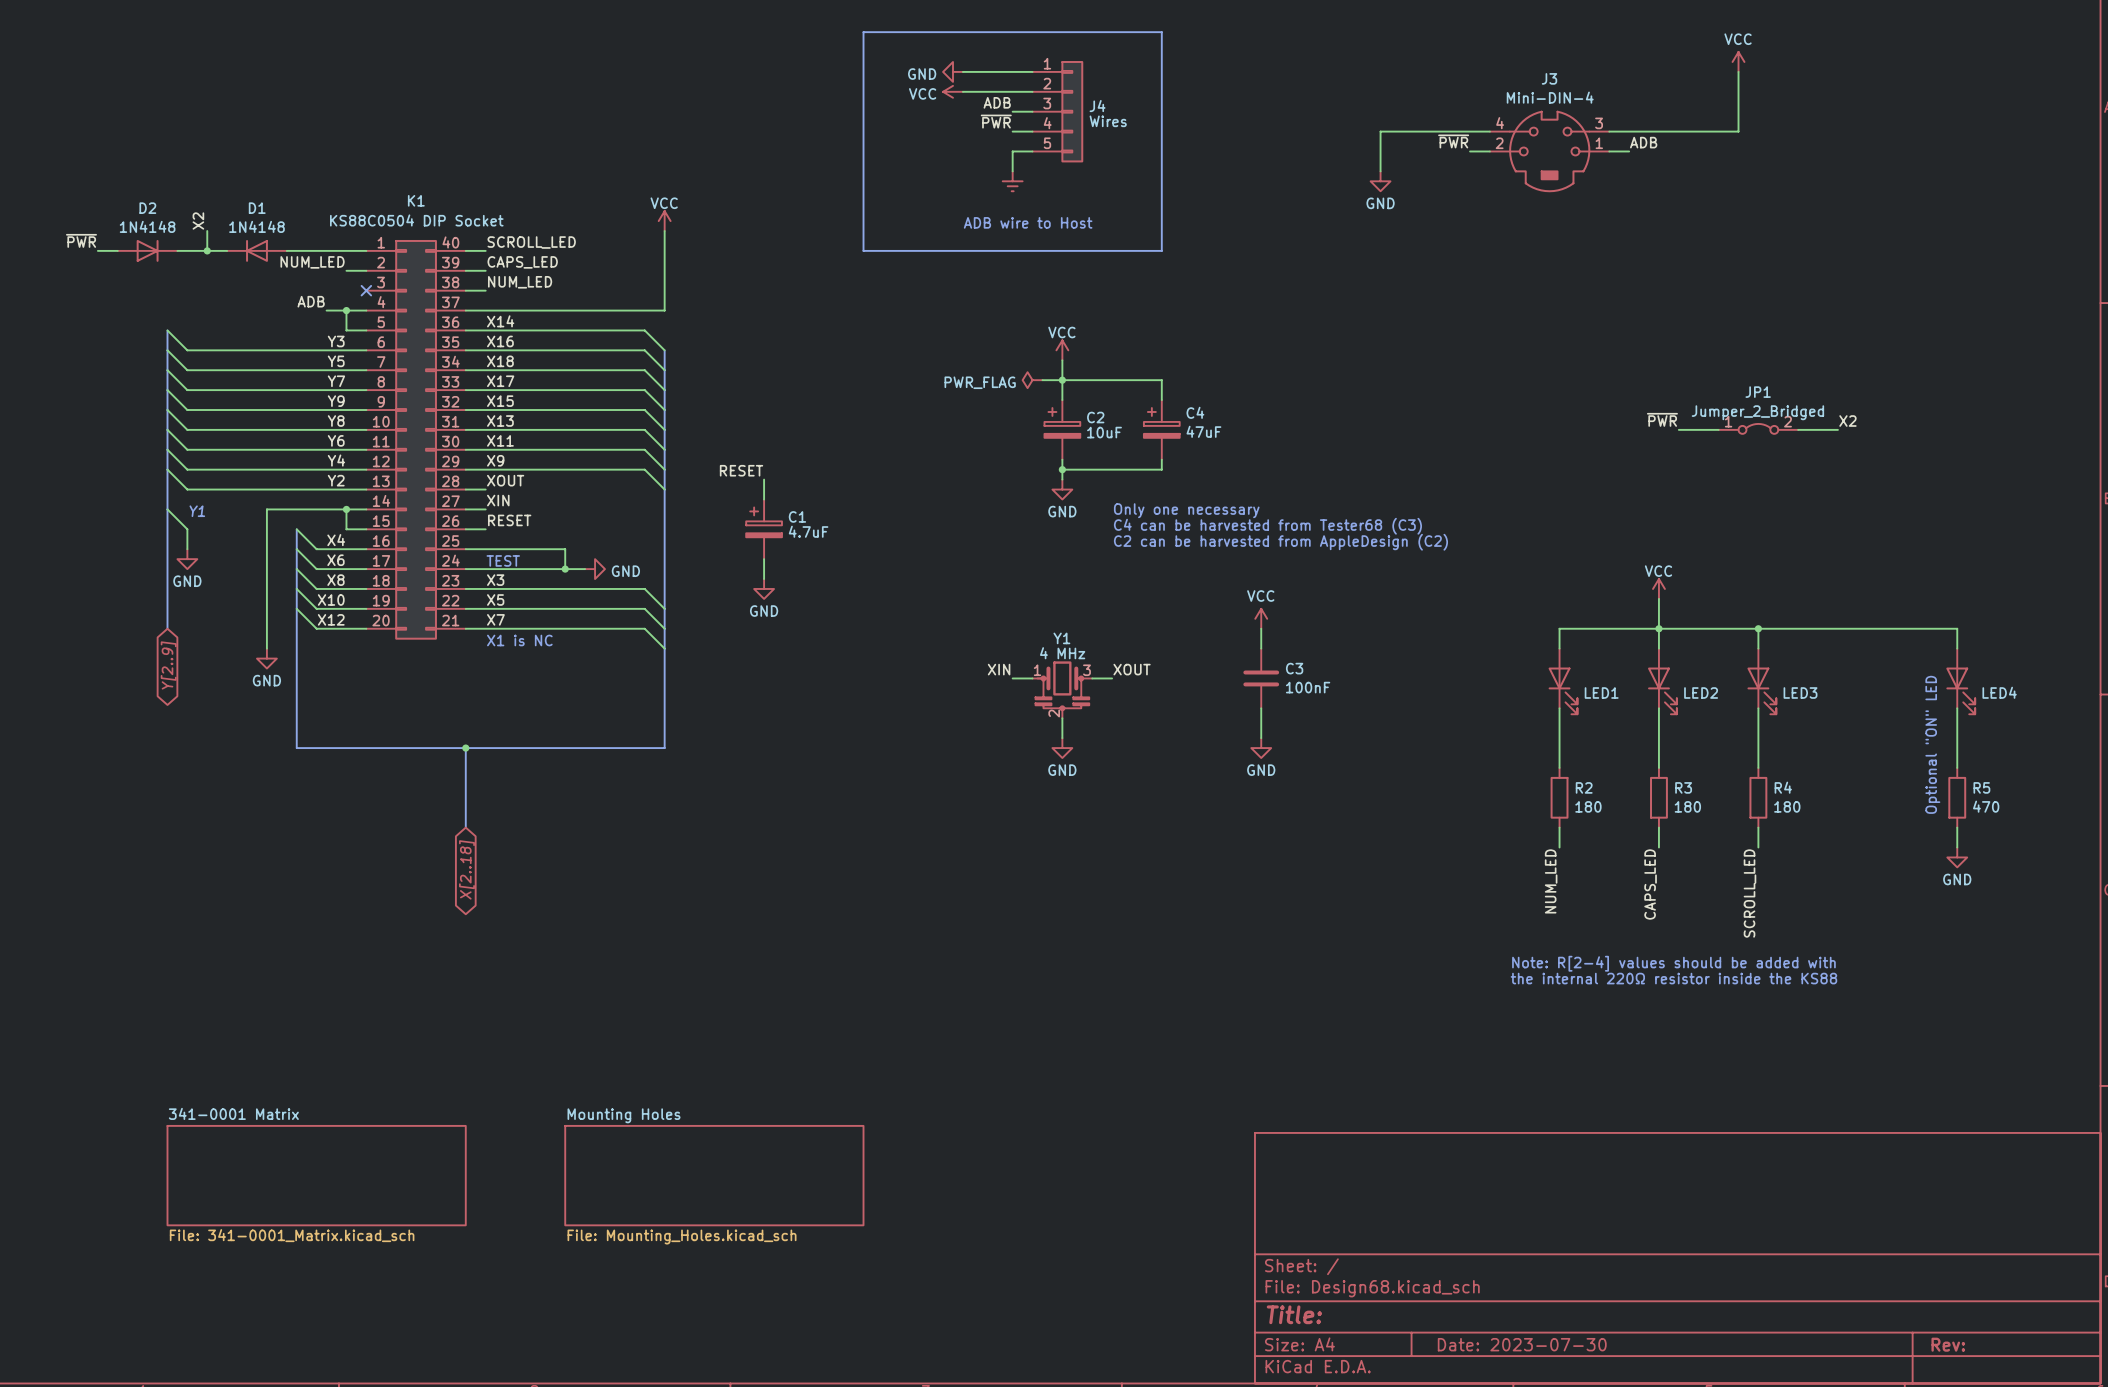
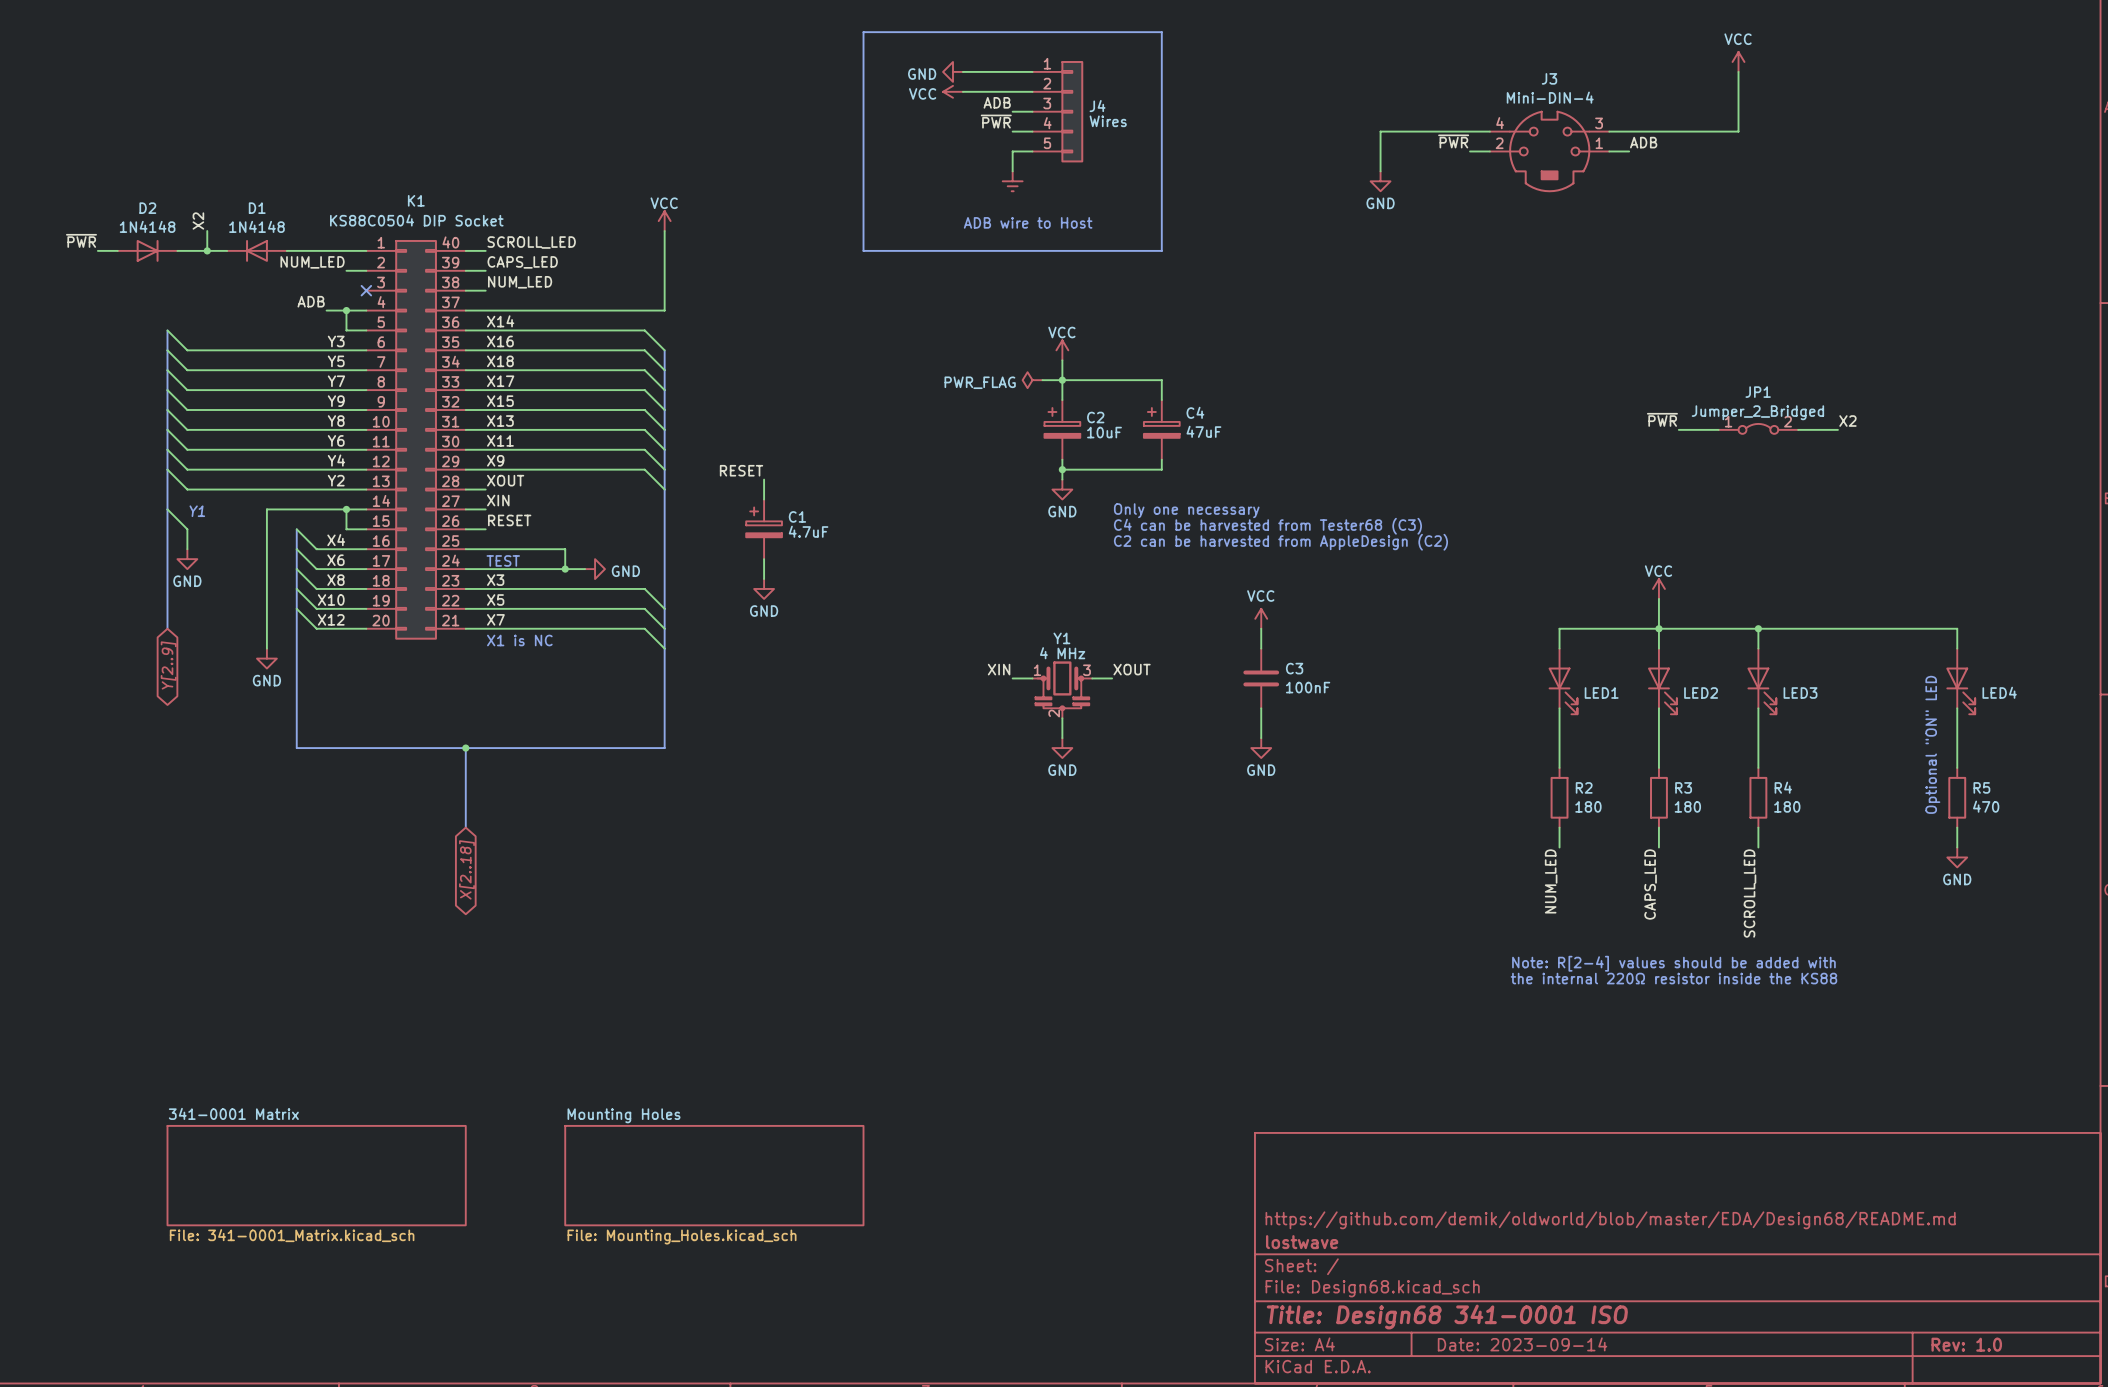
title block: none -> https://github.com/demik/oldworld/blob/master/EDA/Design68/README.md (1610, 1220)
title block: none -> lostwave (1302, 1242)
title block: Title: (1294, 1314) -> Title: Design68 341-0001 ISO (1447, 1317)
title block: Date: 2023-07-30 (1522, 1344) -> Date: 2023-09-14 (1522, 1344)
title block: Rev: (1948, 1344) -> Rev: 1.0 (1966, 1344)

